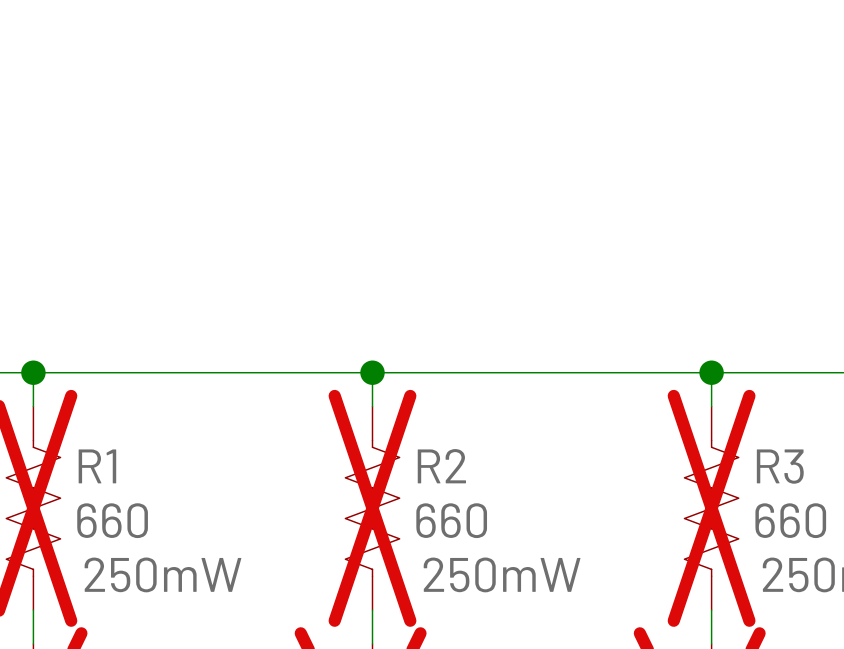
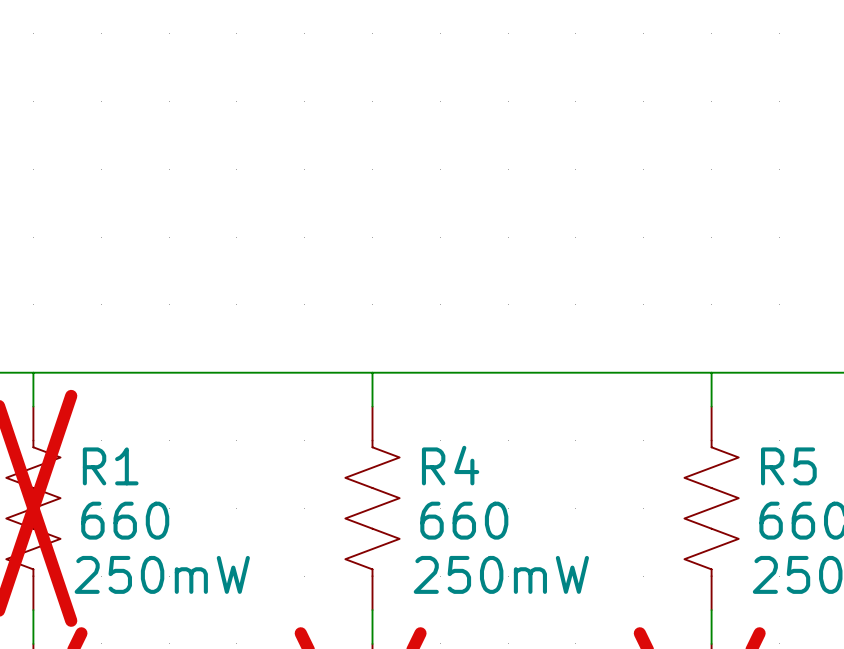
junction: (33, 372) -> none
junction: (372, 372) -> none
junction: (711, 372) -> none
R2 name: R2 (441, 466) -> R4 (450, 465)
R3 name: R3 (780, 466) -> R5 (788, 466)
R2 do-not-place cross: (372, 508) -> none
R3 do-not-place cross: (711, 508) -> none

